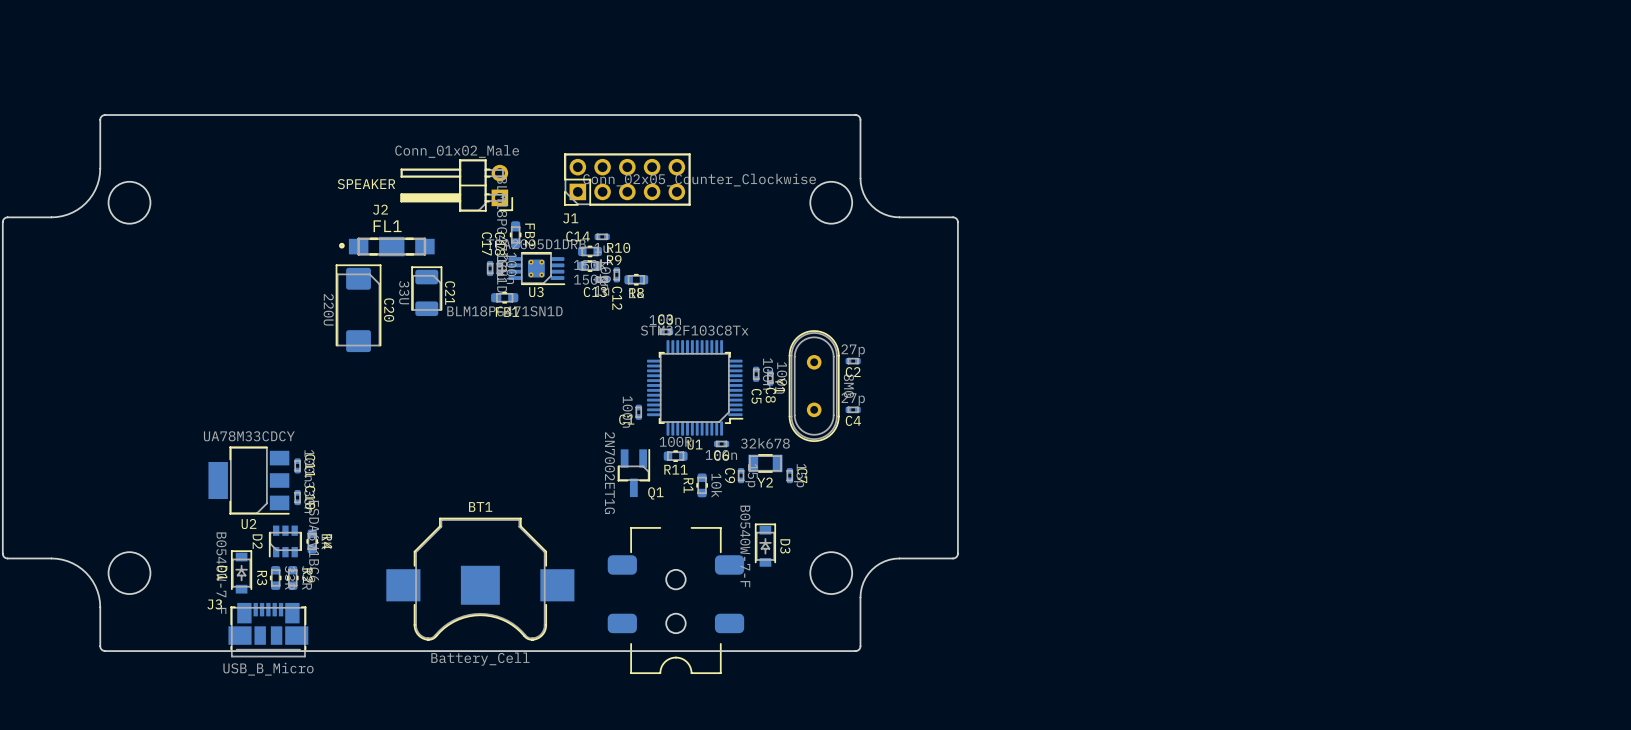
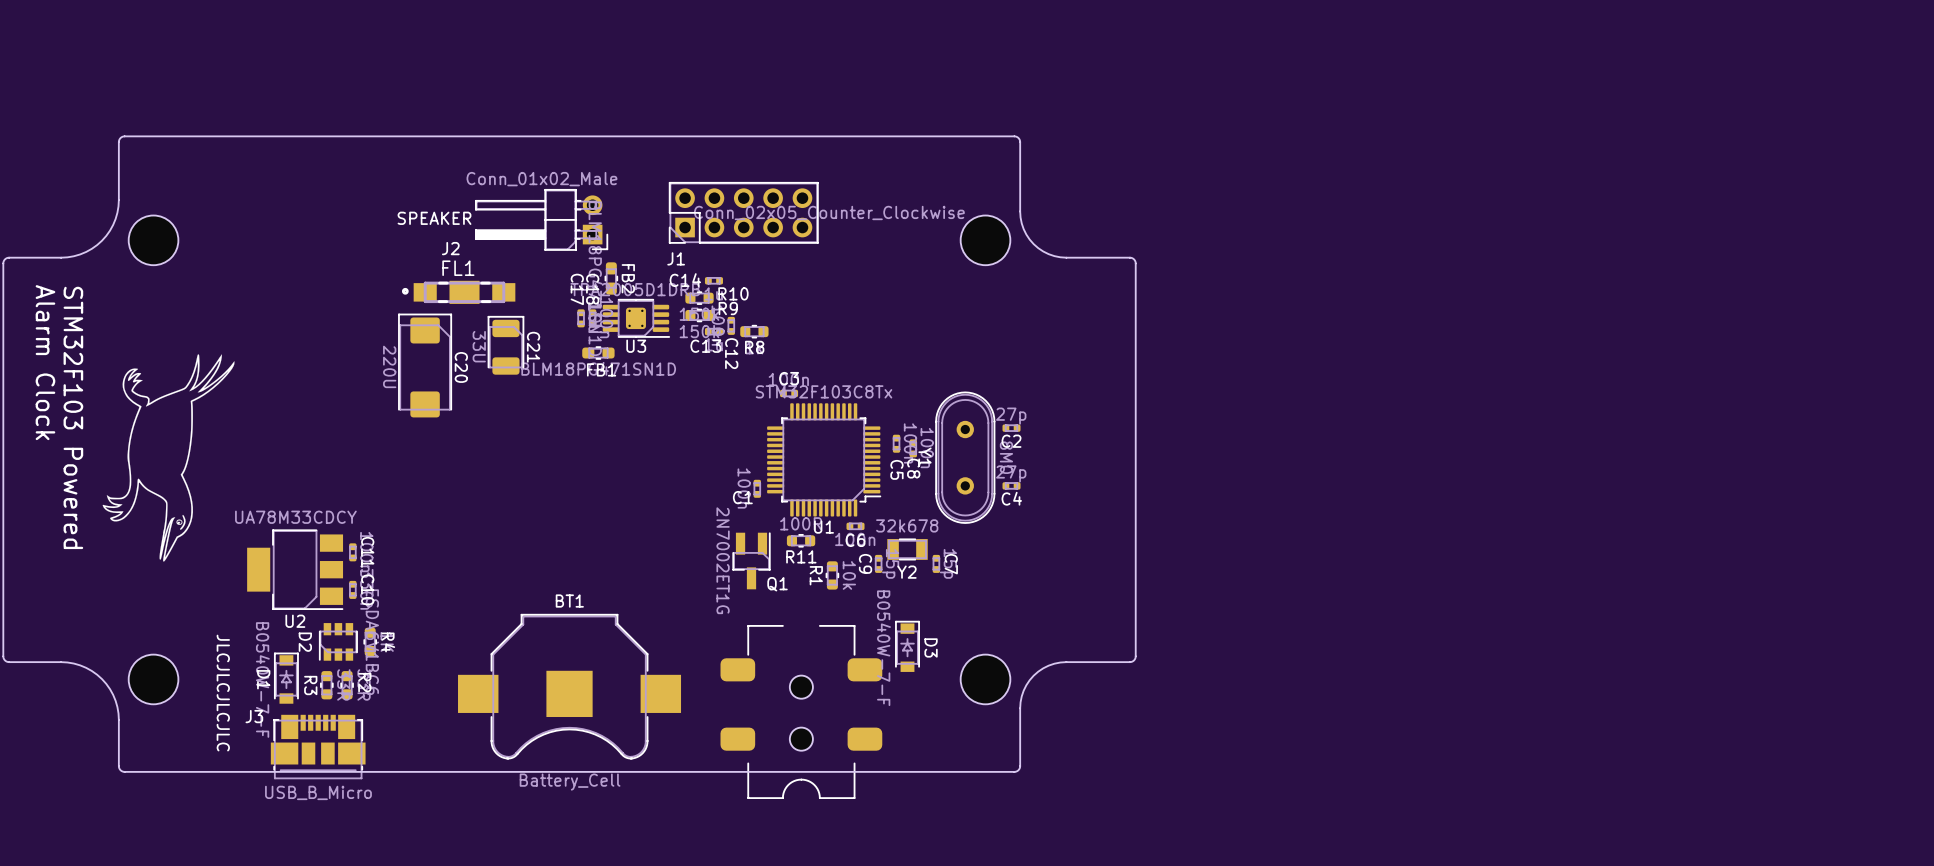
drawing: none -> [102, 354, 235, 562]
text: none -> Alarm Clock (45, 362)
text: none -> STM32F103 Powered (73, 417)
text: none -> JLCJLCJLCJLC (223, 693)

